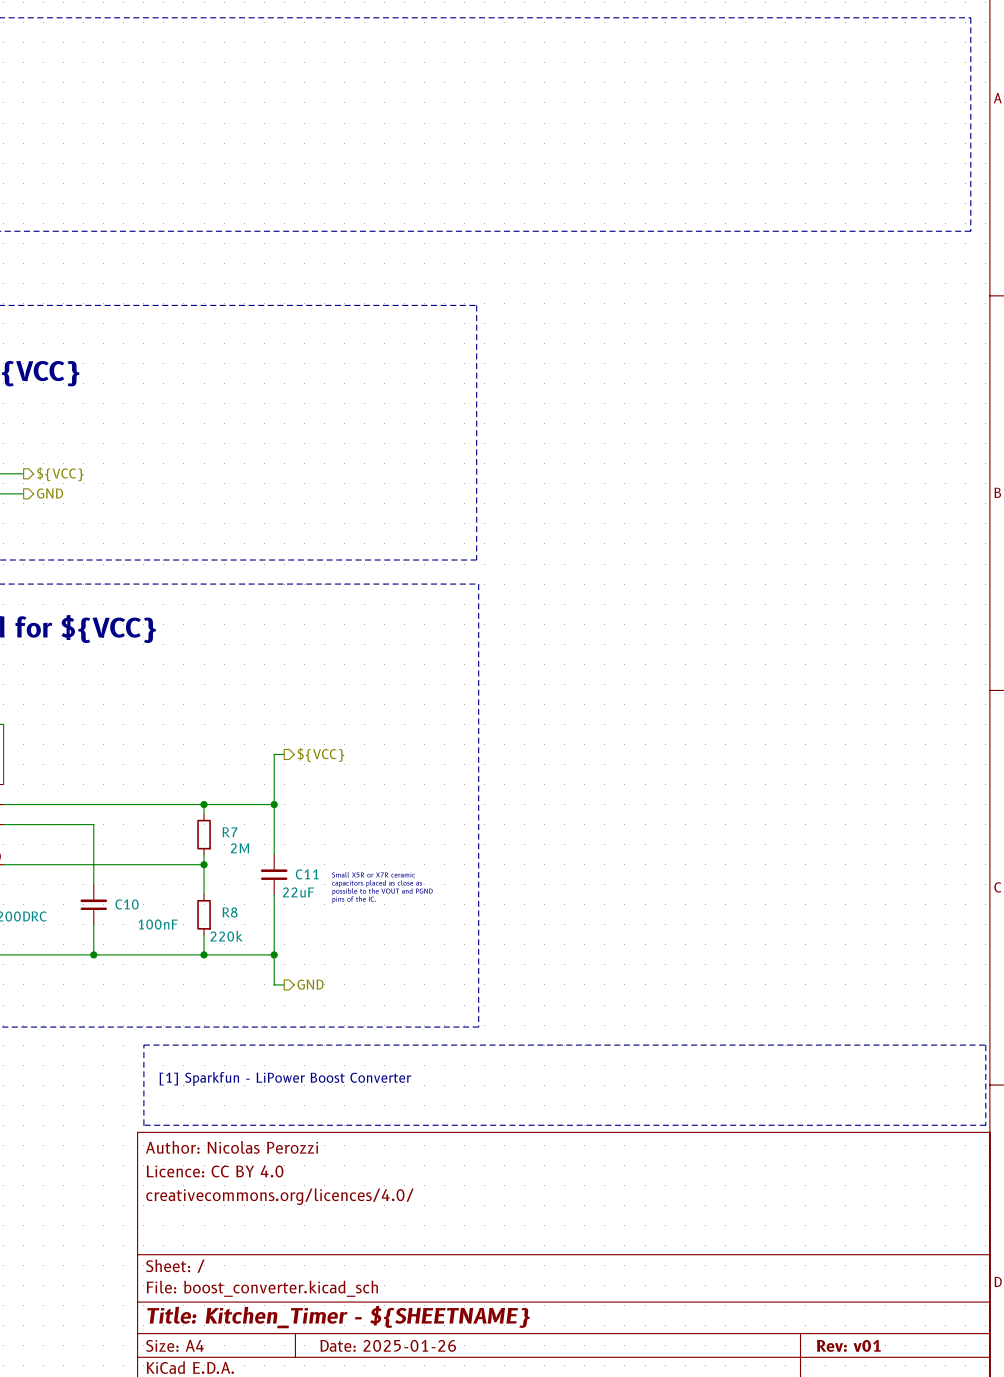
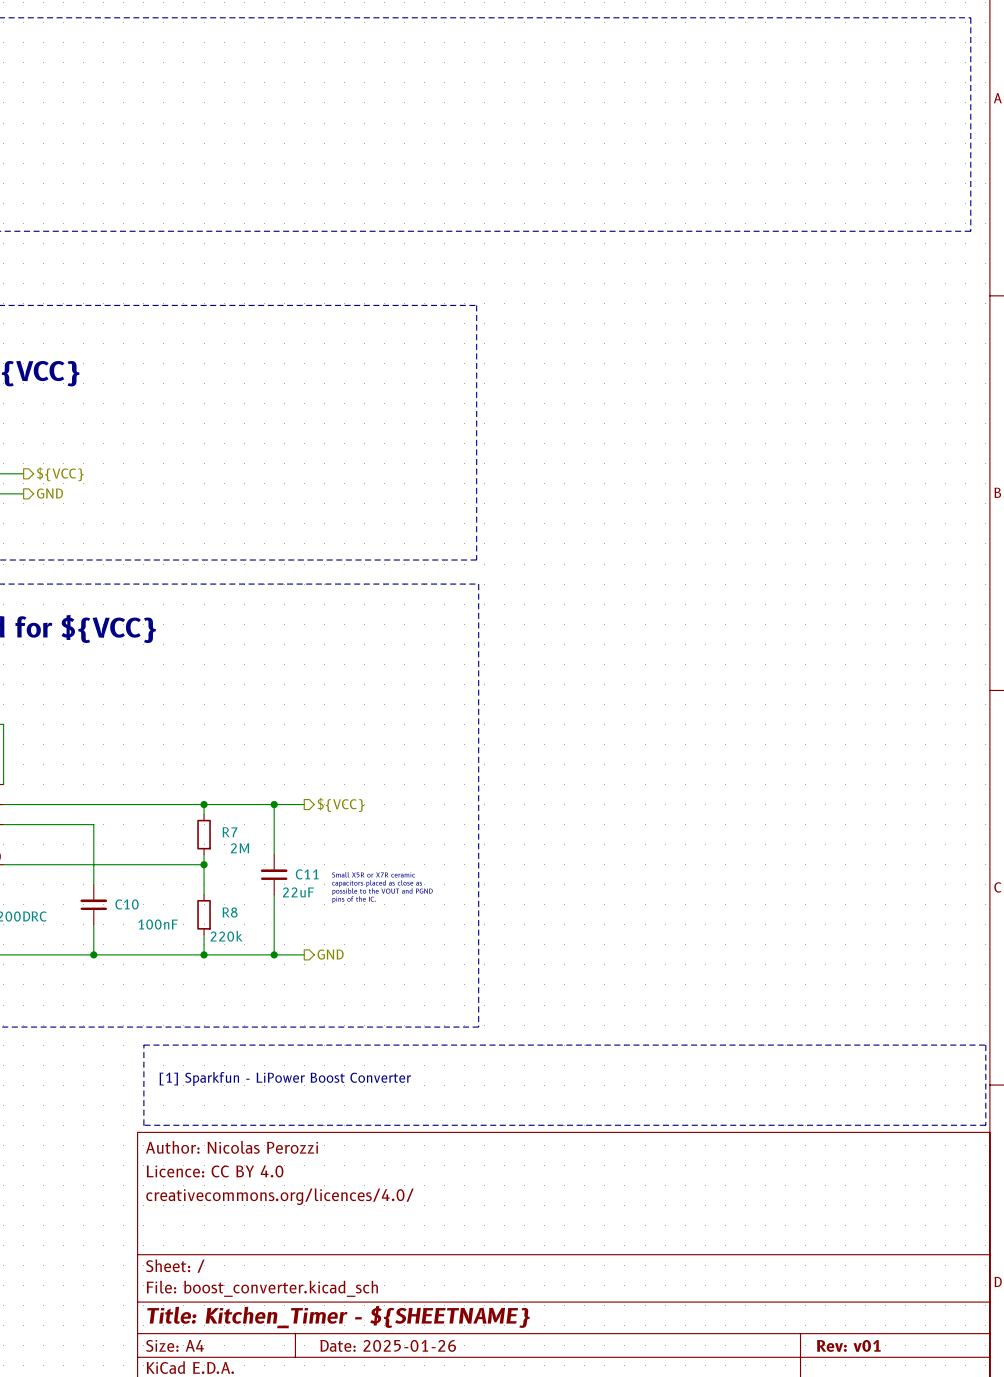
wire: (284, 754) (274, 754) (274, 804) -> (304, 804) (274, 804)
hierarchical label position: ${VCC} (320, 754) -> ${VCC} (340, 804)
wire: (274, 954) (274, 984) (284, 984) -> (274, 954) (304, 954)
hierarchical label position: GND (310, 984) -> GND (330, 954)

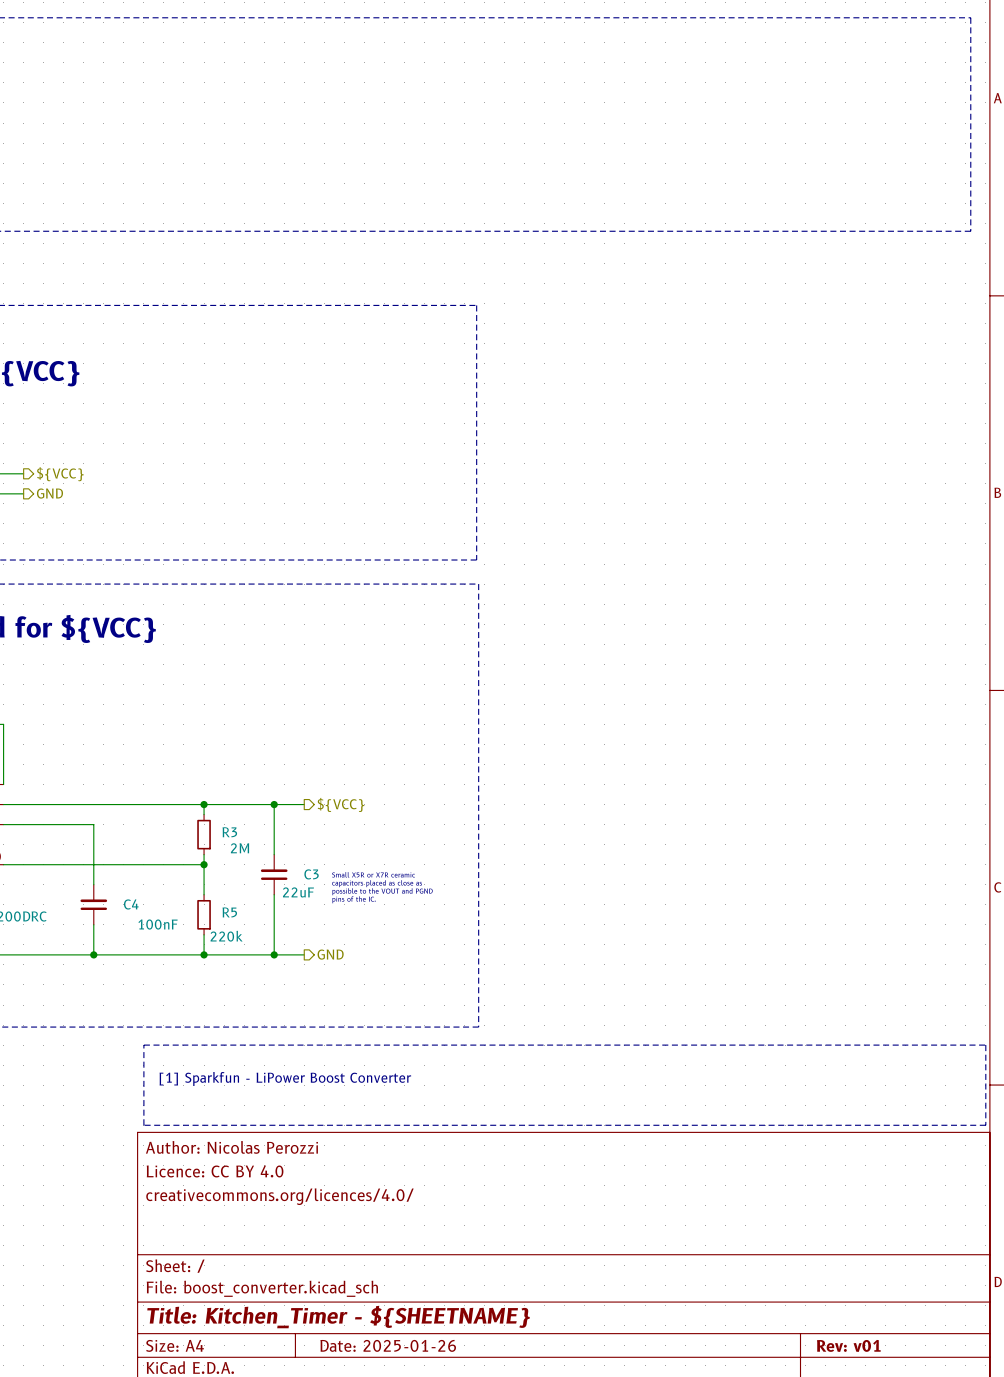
R7 name: R7 (229, 832) -> R3 (229, 832)
C11 name: C11 (307, 874) -> C3 (311, 874)
C10 name: C10 (127, 904) -> C4 (131, 904)
R8 name: R8 (230, 912) -> R5 (229, 912)

